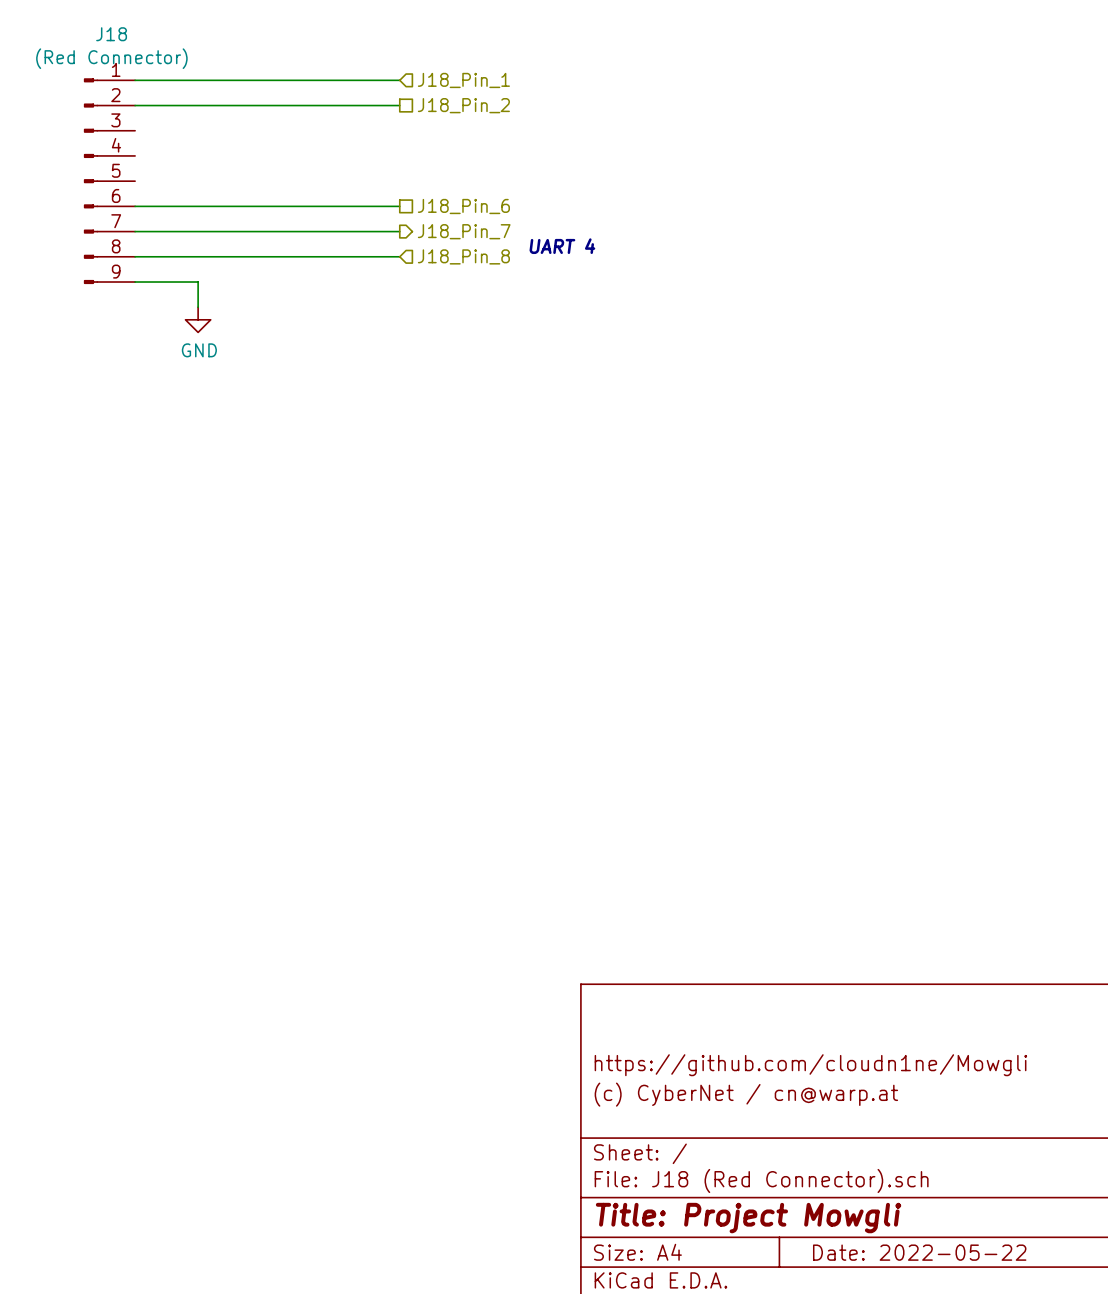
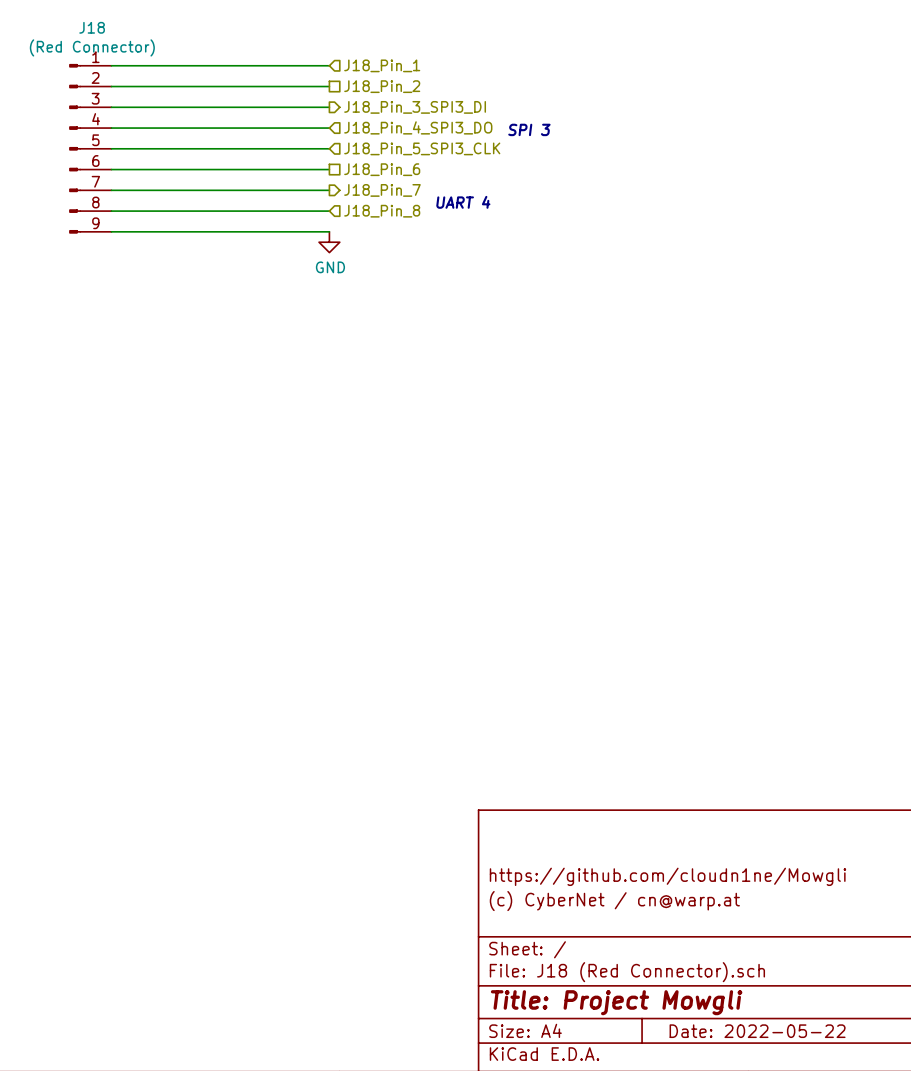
wire: none -> (111, 107) (329, 107)
hierarchical label: none -> J18_Pin_3_SPI3_DI (415, 107)
wire: none -> (111, 128) (329, 128)
hierarchical label: none -> J18_Pin_4_SPI3_DO (418, 127)
text: none -> SPI 3 (529, 129)
wire: none -> (111, 148) (329, 148)
hierarchical label: none -> J18_Pin_5_SPI3_CLK (422, 148)
wire: (198, 282) (198, 307) -> (163, 231) (329, 231)
power symbol position: GND (198, 319) -> GND (329, 242)

